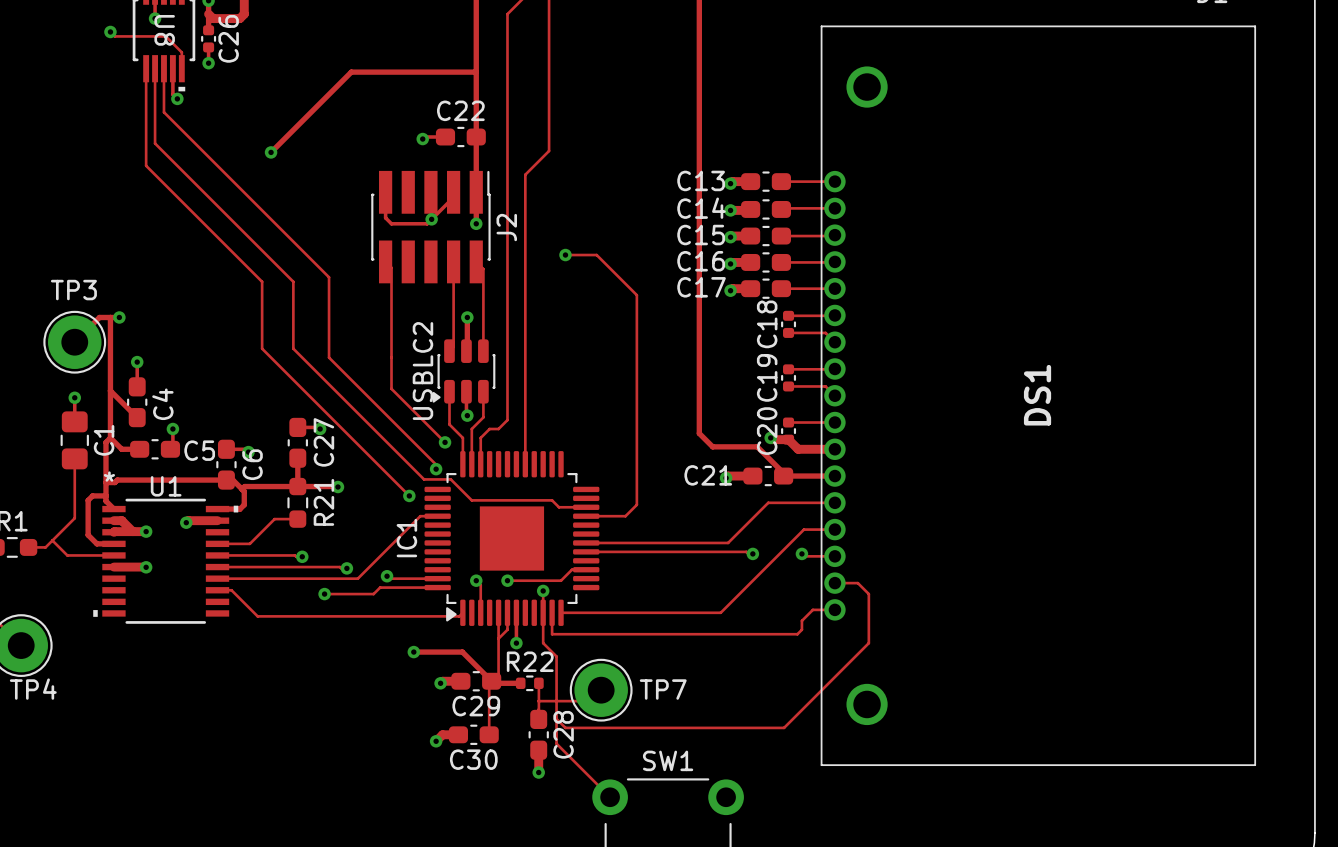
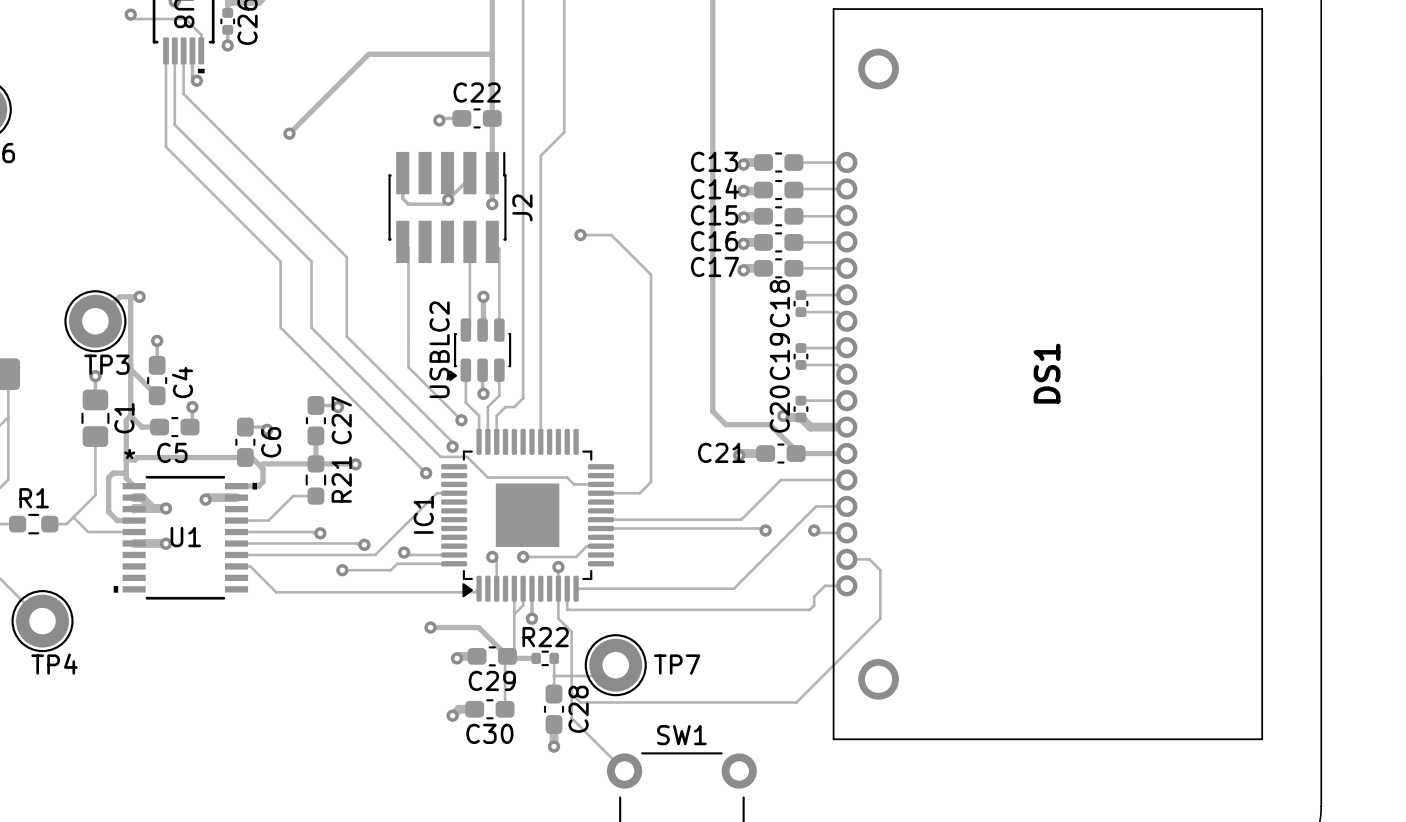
TP3 name position: TP3 (73, 290) -> TP3 (106, 364)
C5 name position: C5 (199, 450) -> C5 (172, 452)
U1 name position: U1 (166, 486) -> U1 (185, 537)

